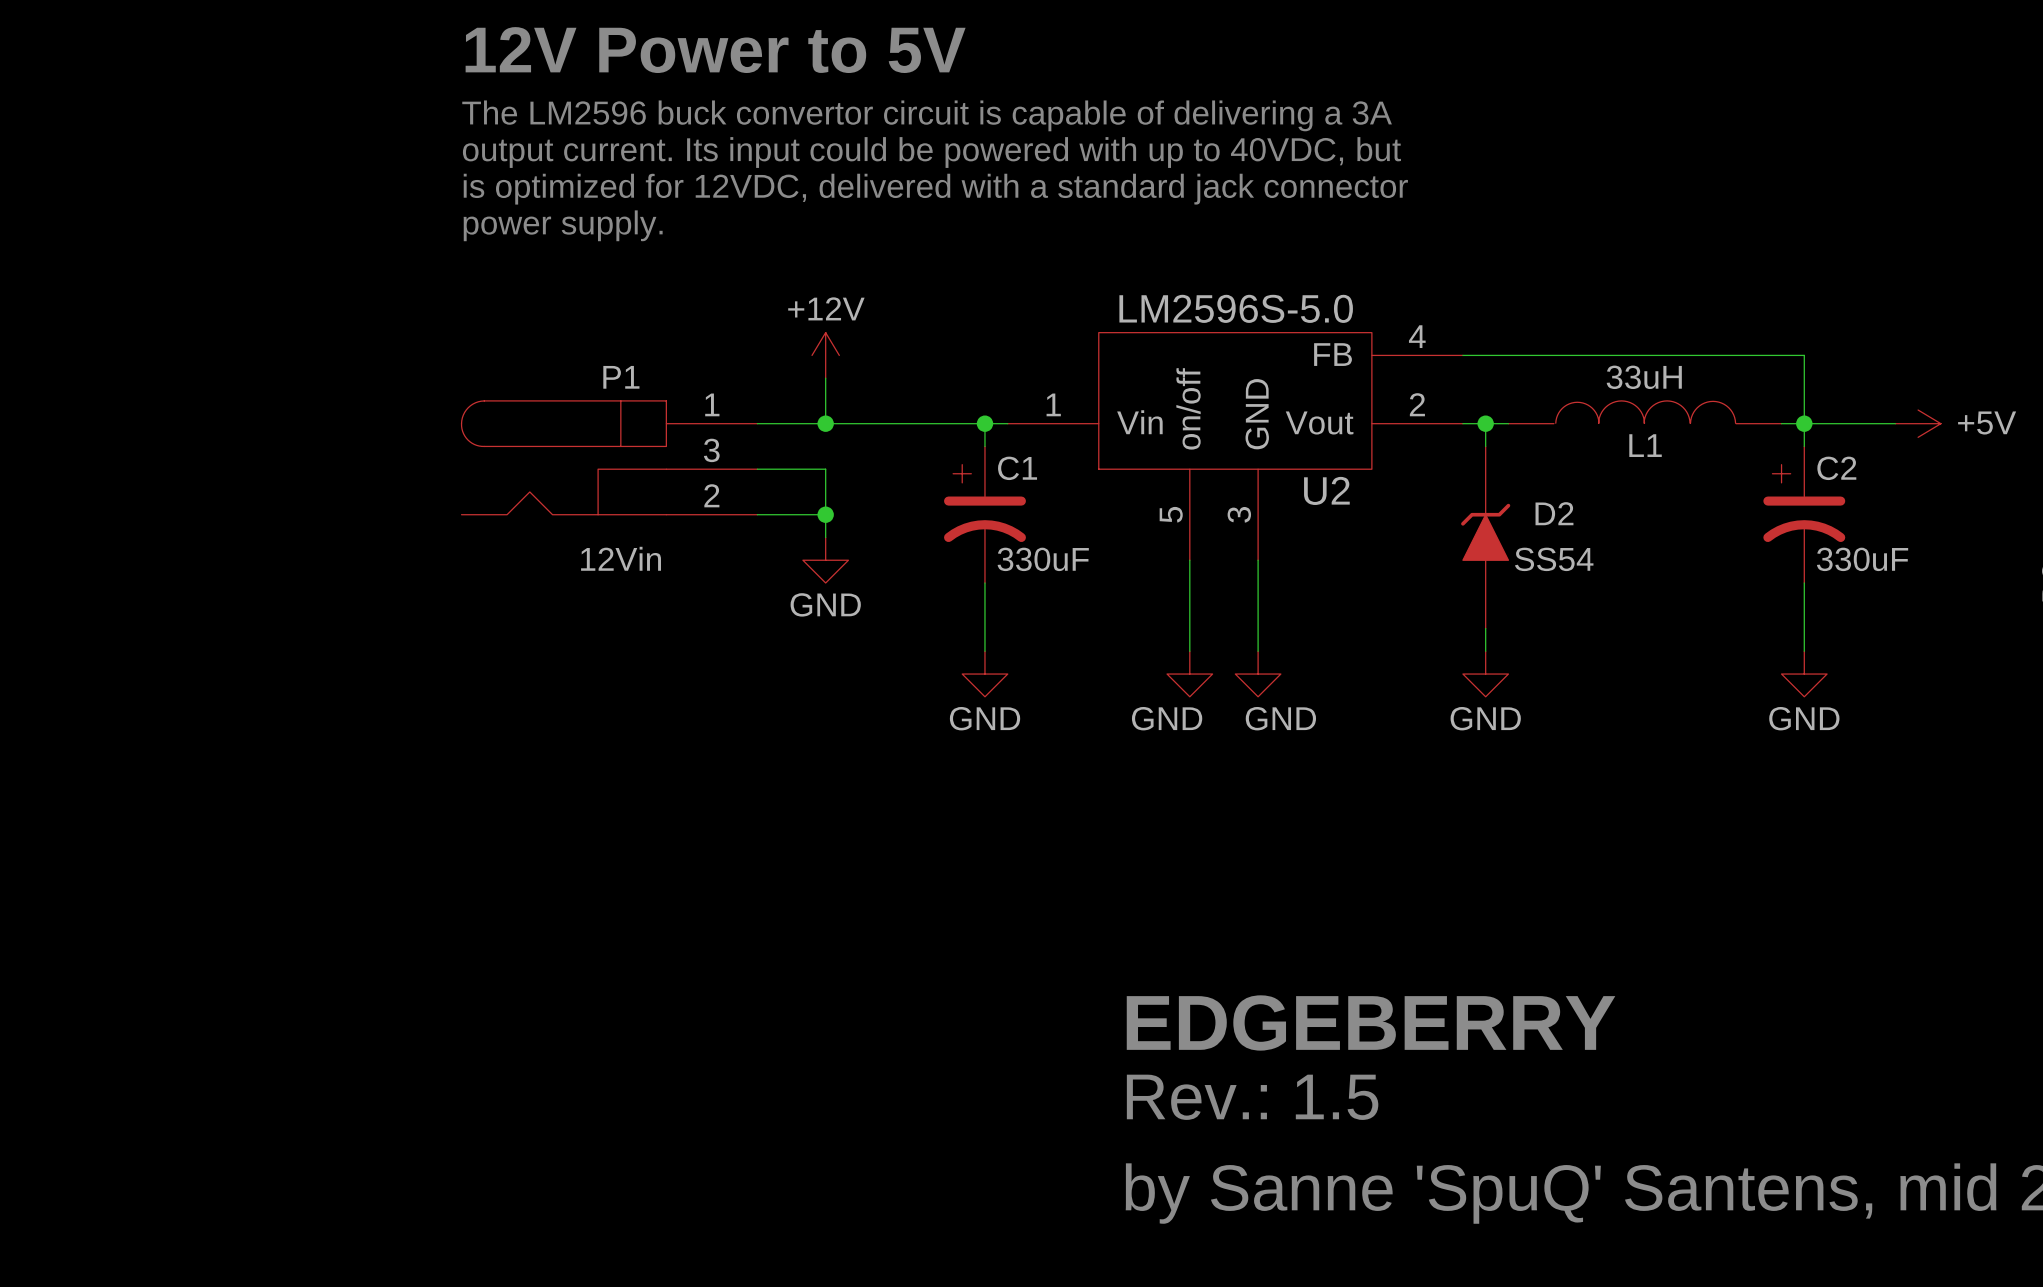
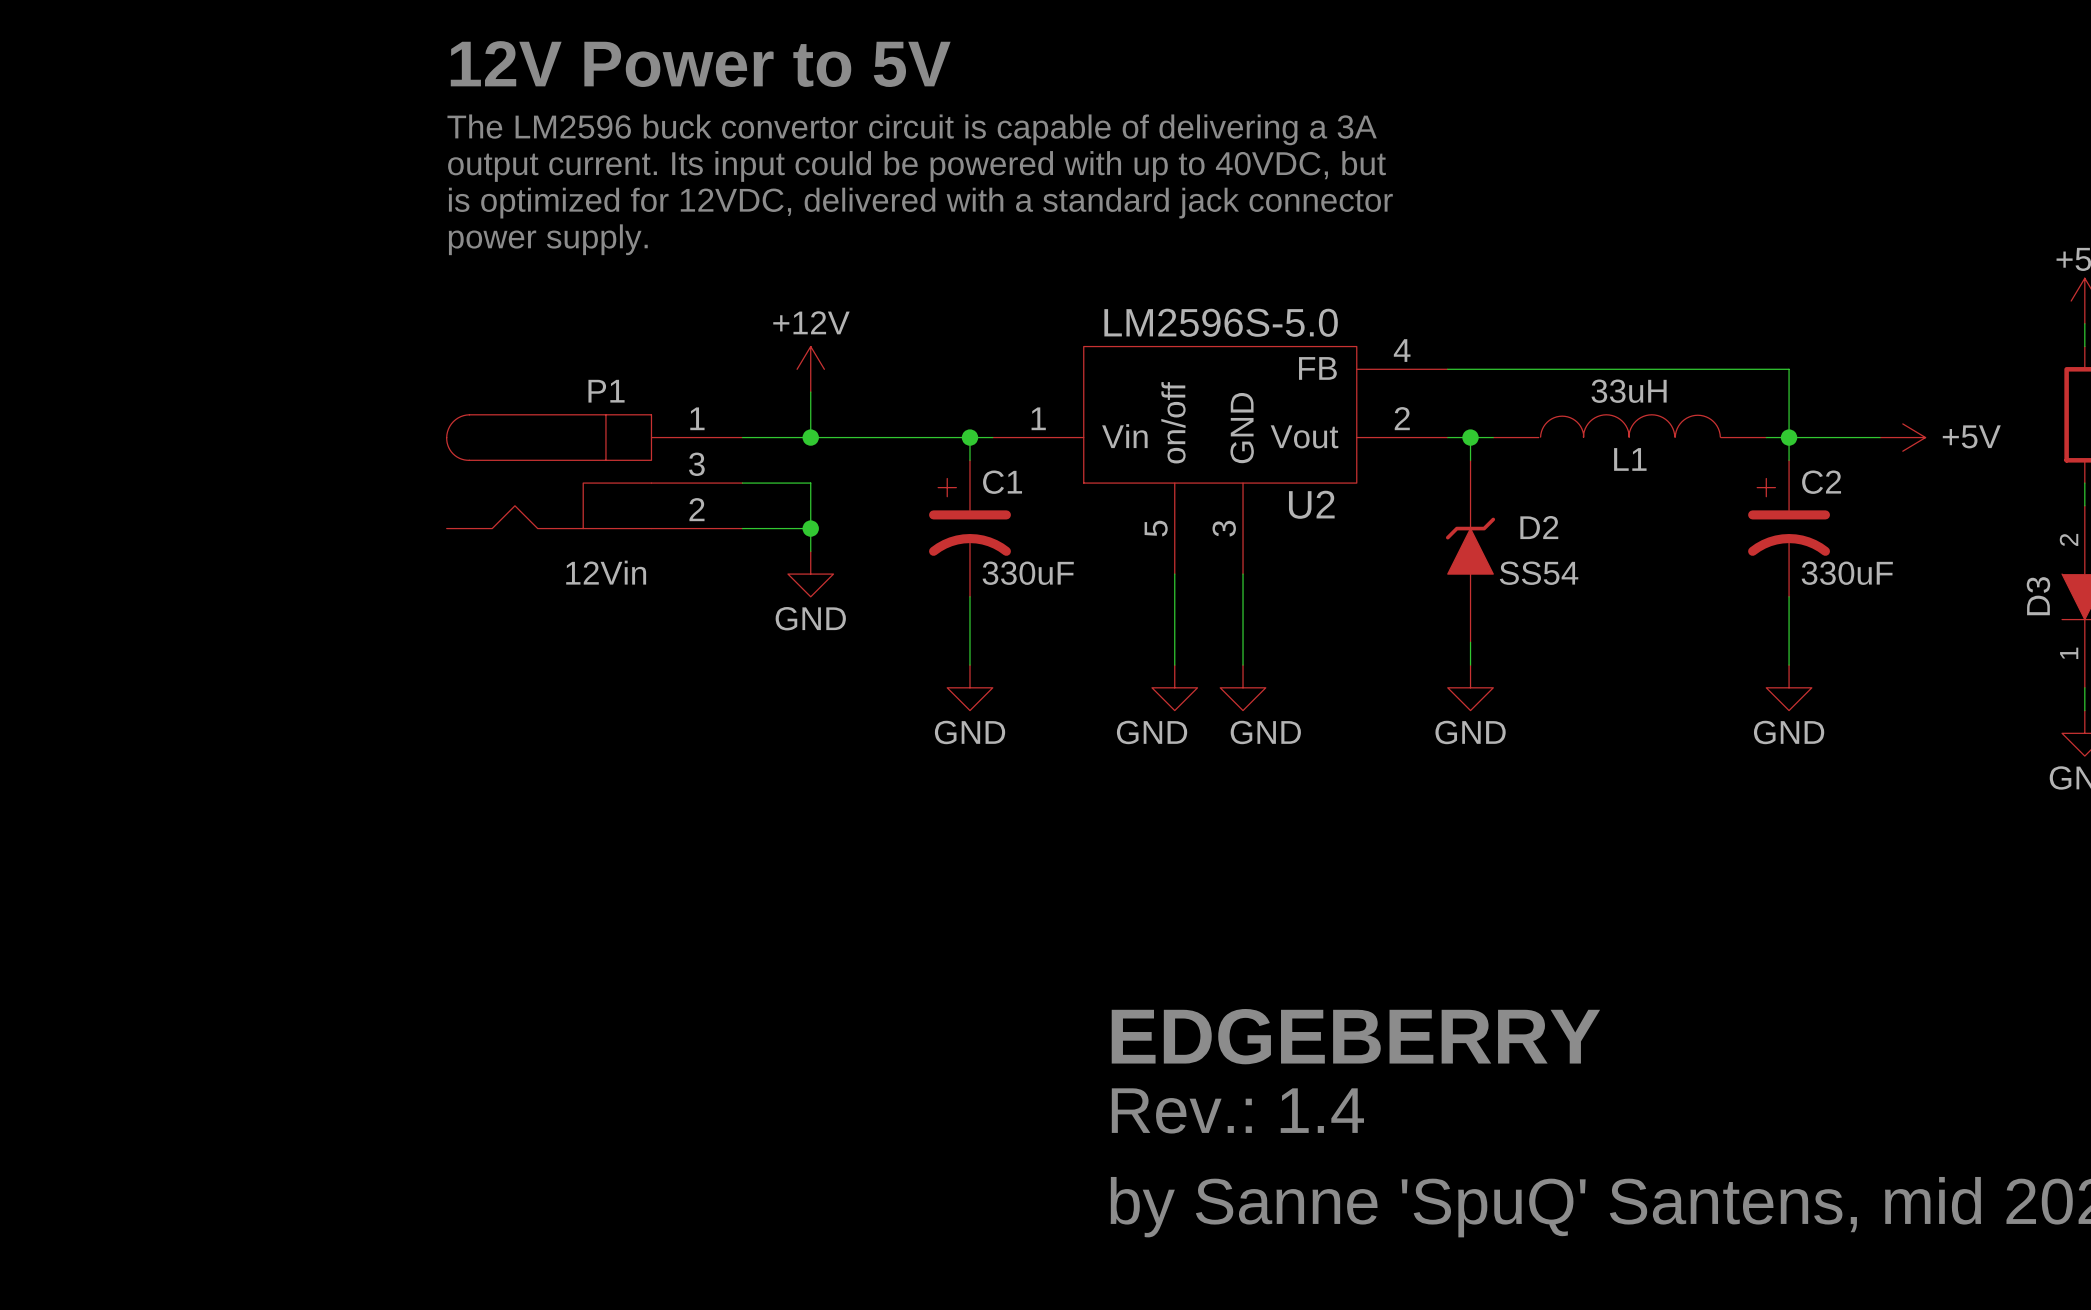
text: Rev.: 1.5 (1252, 1097) -> Rev.: 1.4 (1237, 1110)

